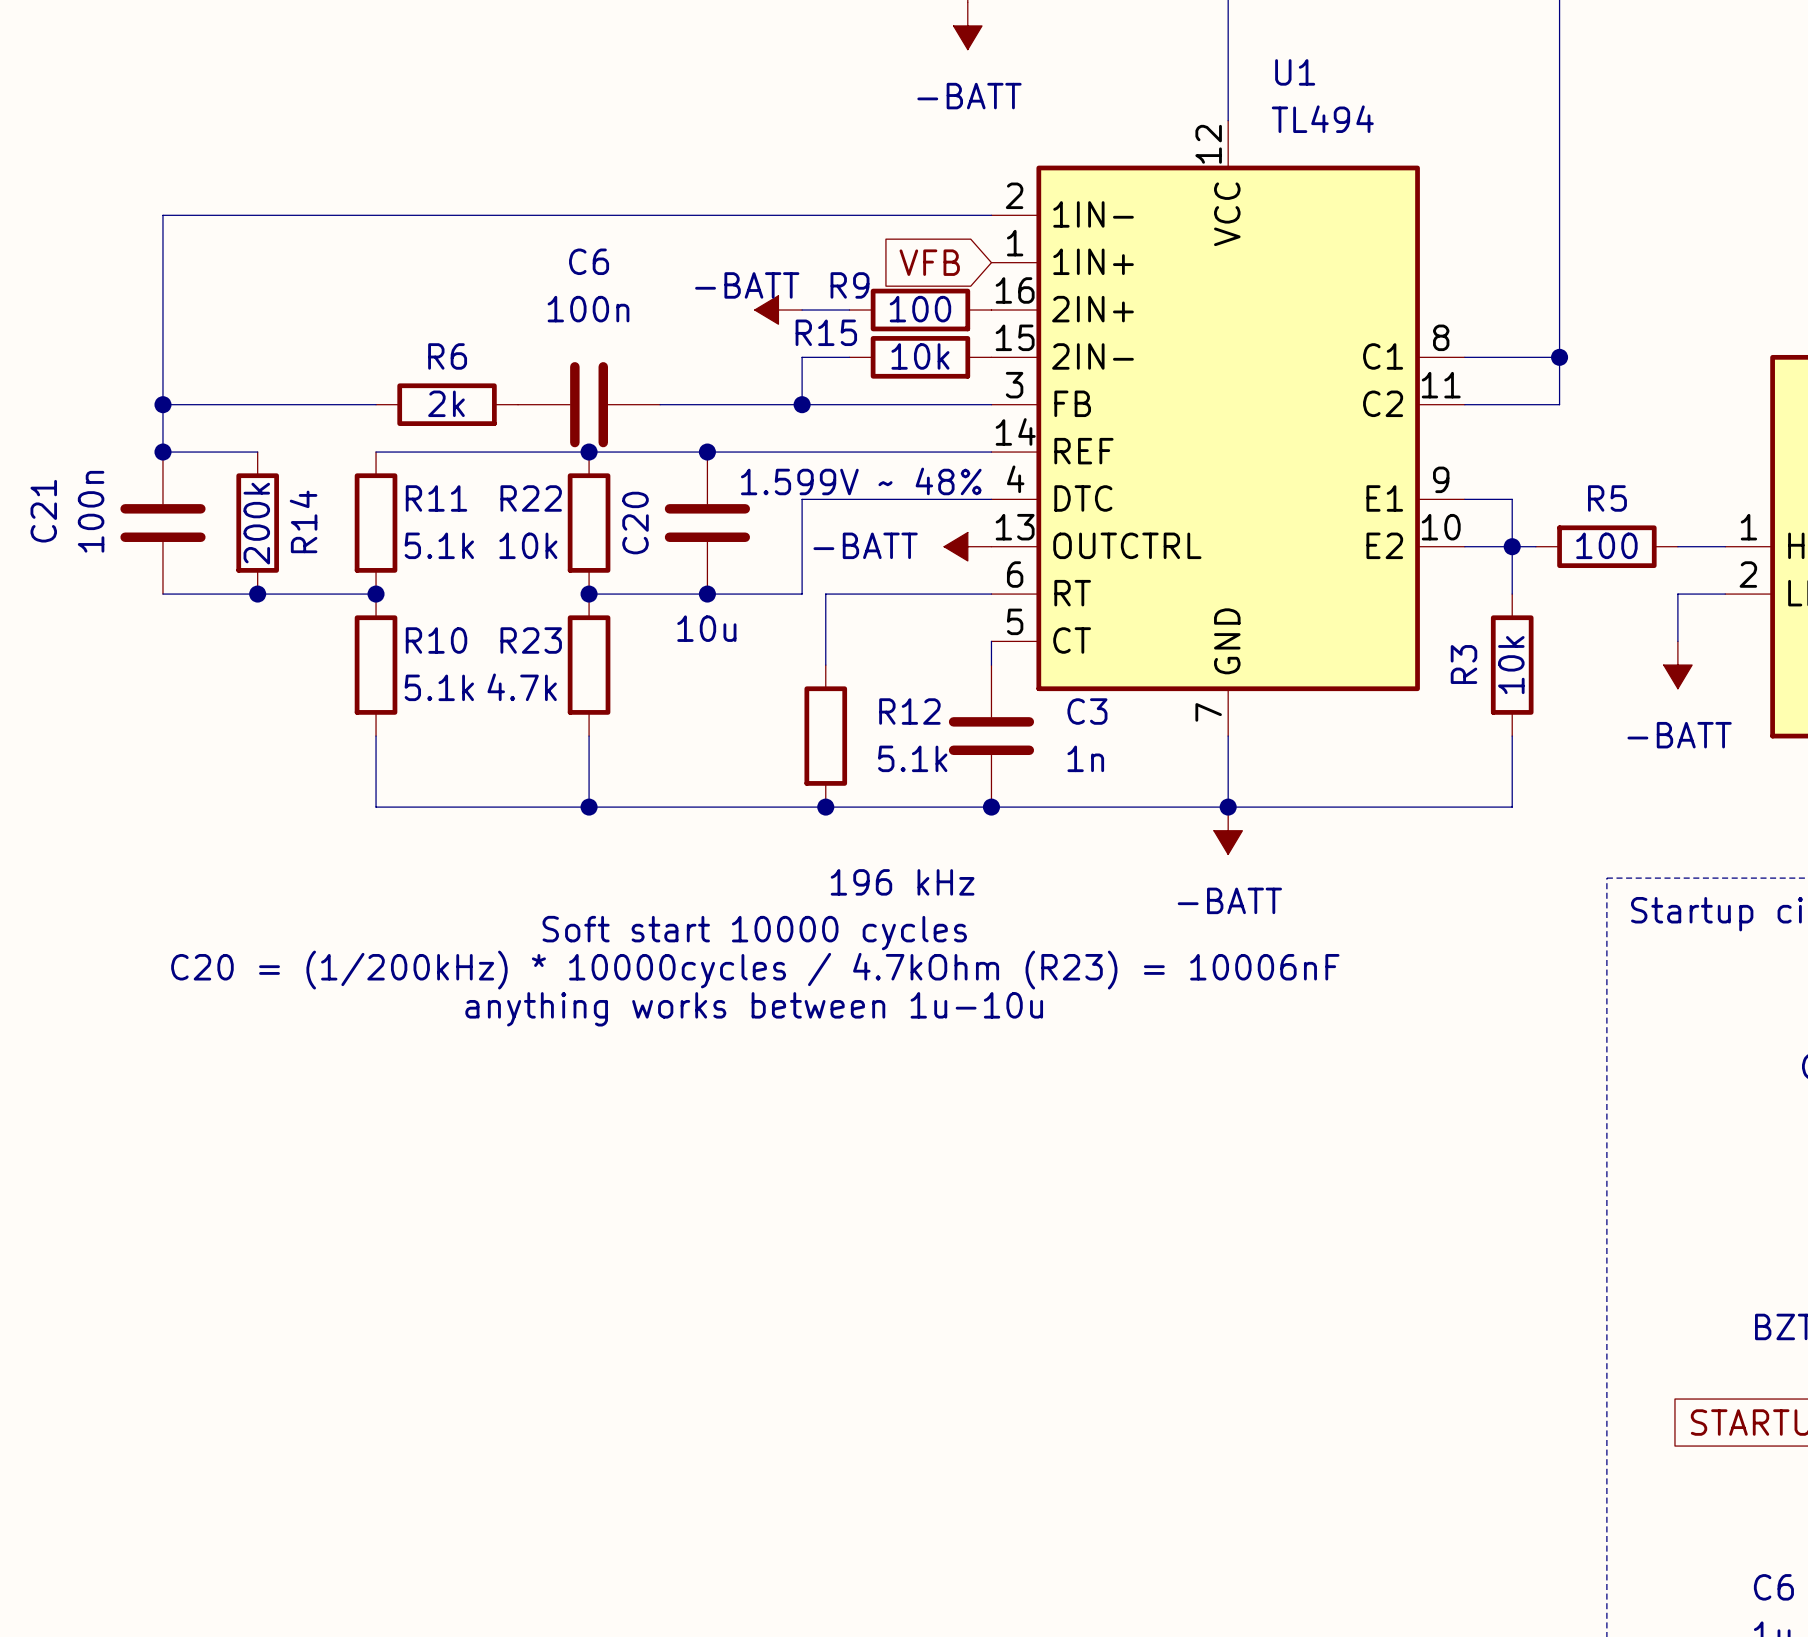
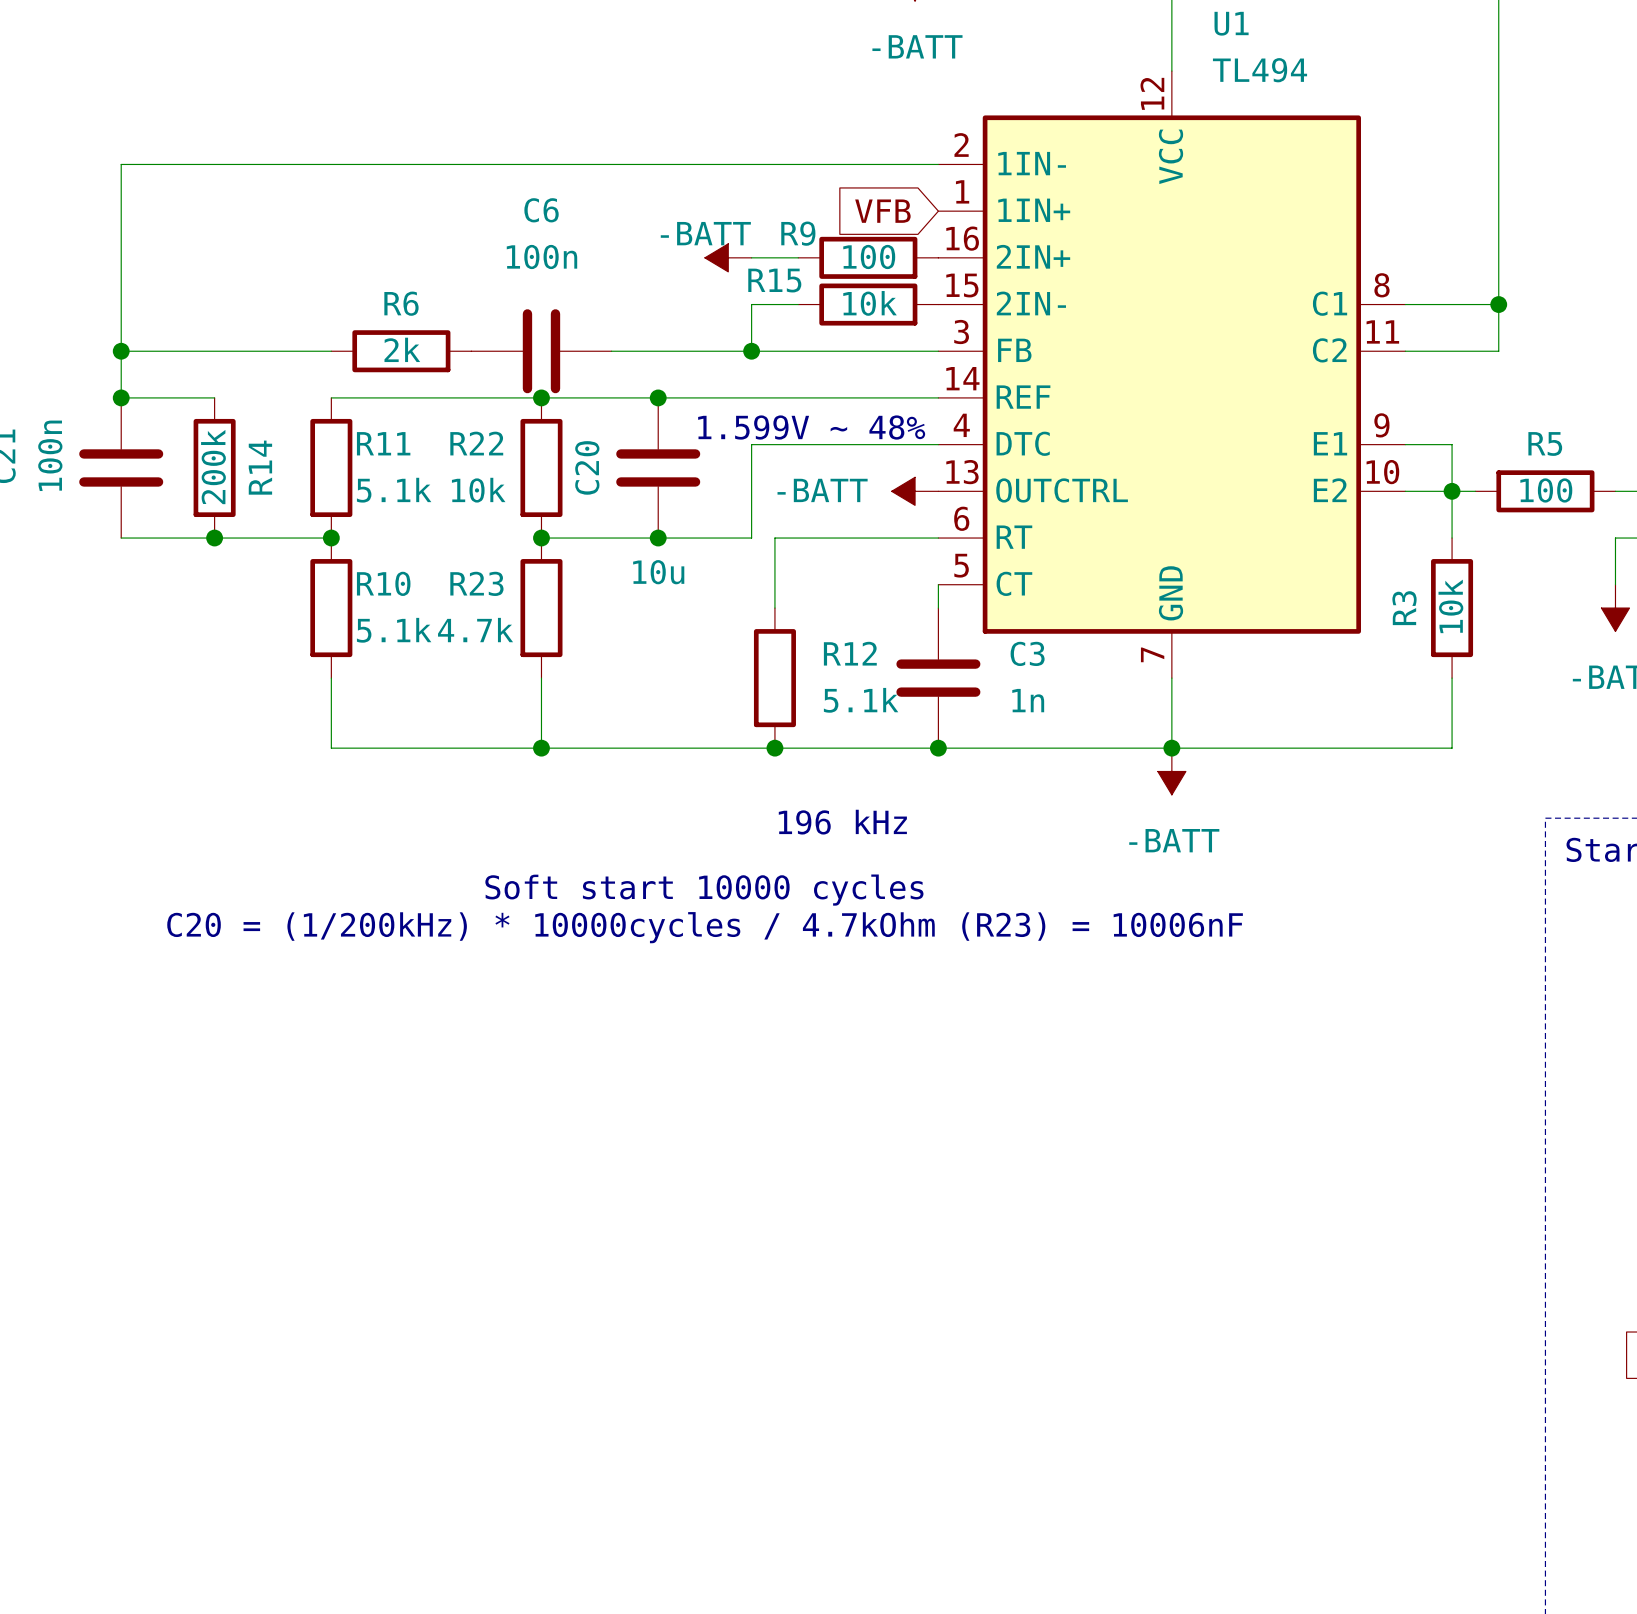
text position: Soft start 10000 cycles (754, 933) -> Soft start 10000 cycles (704, 890)
text position: C20 = (1/200kHz) * 10000cycles / 4.7kOhm (R23) = 10006nF (755, 970) -> C20 = (1/200kHz) * 10000cycles / 4.7kOhm (R23) = 10006nF (705, 927)
text: anything works between 1u-10u (754, 1009) -> none

